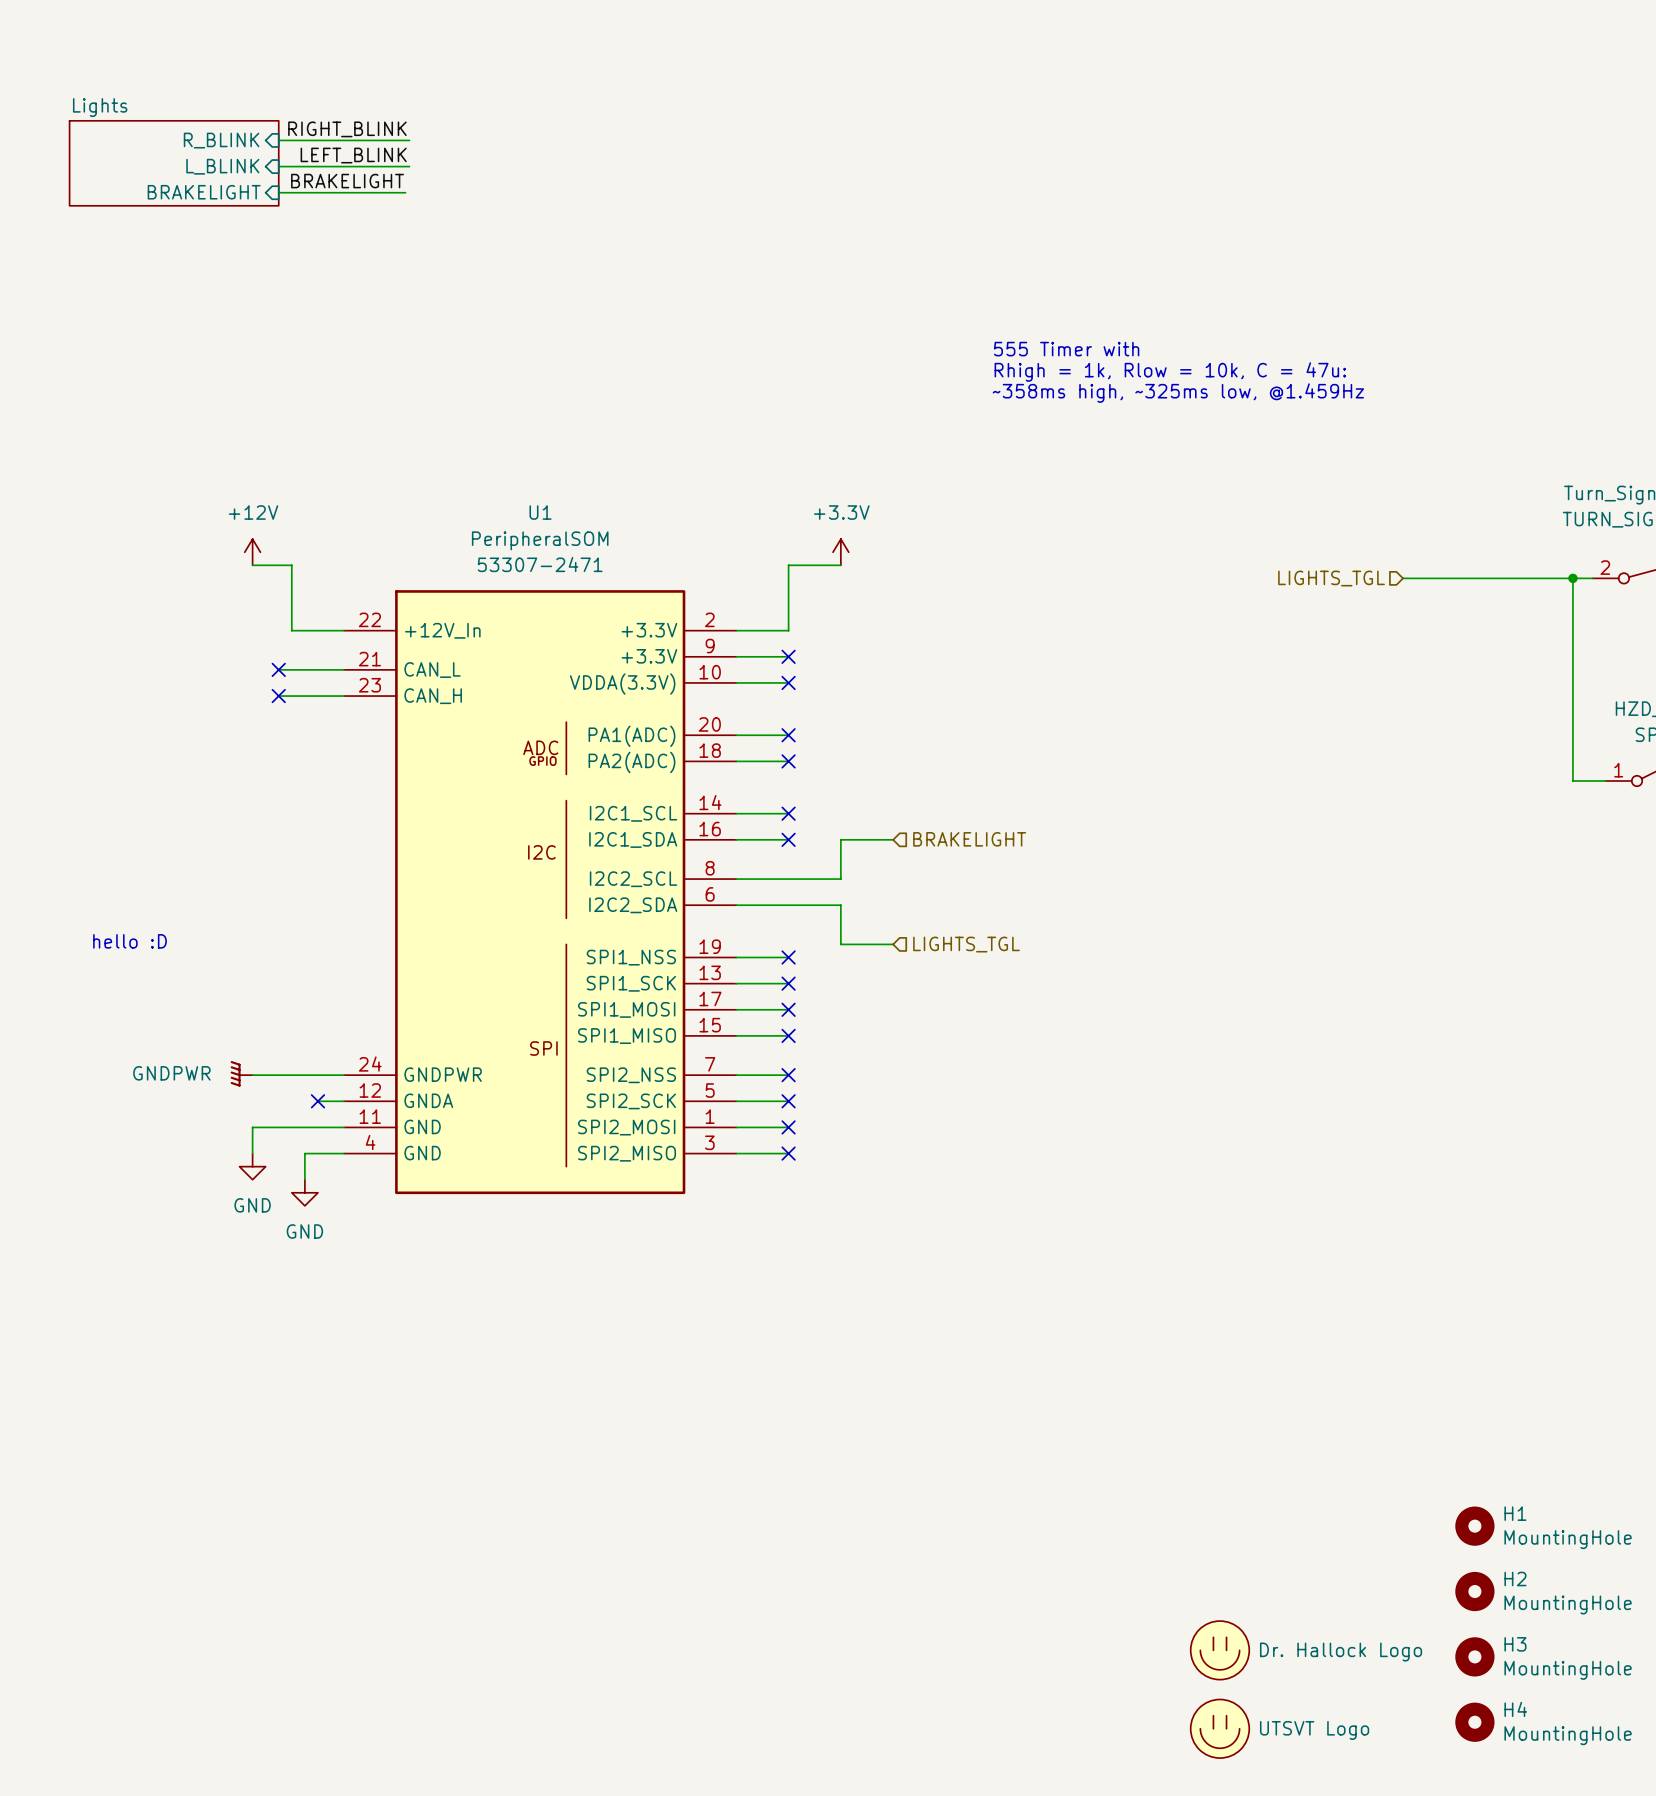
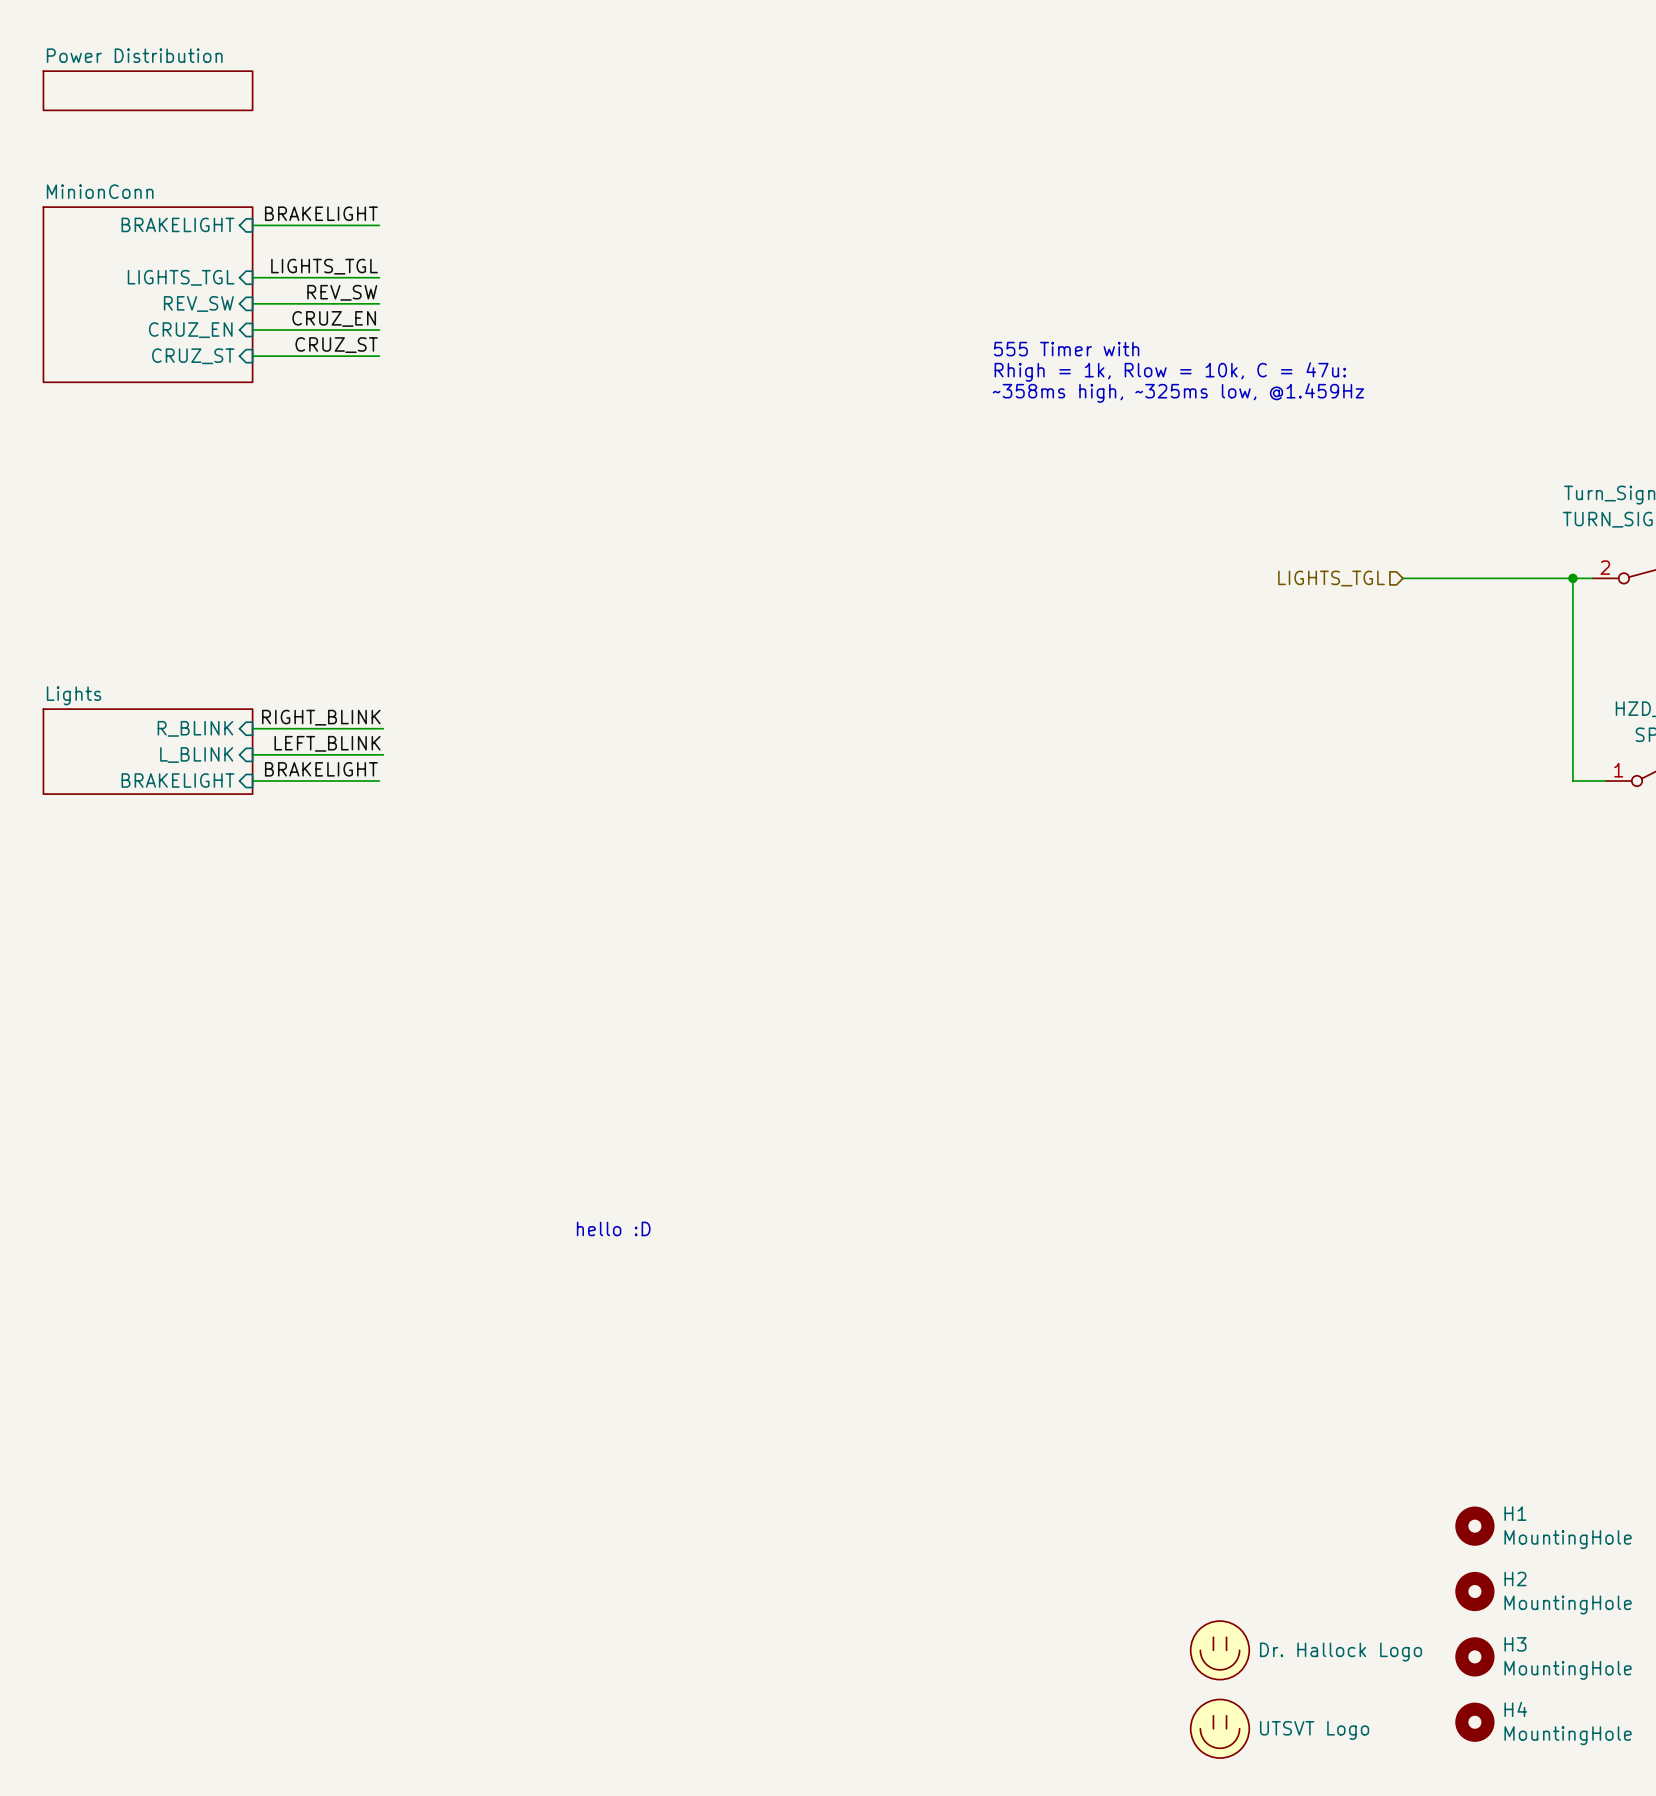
sheet Power Distribution: none -> (148, 90)
label: RIGHT_BLINK (347, 129) -> none
sheet pin: R_BLINK (221, 140) -> none
wire: (278, 140) (409, 140) -> none
label: LEFT_BLINK (353, 155) -> none
sheet Lights: (174, 163) -> none
sheet pin: L_BLINK (222, 166) -> none
wire: (278, 166) (409, 166) -> none
label position: BRAKELIGHT (347, 181) -> BRAKELIGHT (321, 213)
sheet pin position: BRAKELIGHT (204, 192) -> BRAKELIGHT (178, 224)
wire: (278, 192) (405, 192) -> (252, 225) (379, 225)
label: none -> LIGHTS_TGL (324, 266)
sheet pin: none -> LIGHTS_TGL (181, 277)
wire: none -> (252, 277) (379, 277)
label: none -> REV_SW (342, 292)
sheet MinionConn: none -> (148, 294)
sheet pin: none -> REV_SW (198, 303)
wire: none -> (252, 303) (379, 303)
label: none -> CRUZ_EN (334, 318)
wire: none -> (252, 329) (379, 329)
sheet pin: none -> CRUZ_EN (190, 330)
label: none -> CRUZ_ST (336, 345)
sheet pin: none -> CRUZ_ST (193, 356)
wire: none -> (252, 356) (379, 356)
power symbol: +12V (252, 552) -> none
power symbol: +3.3V (840, 552) -> none
wire: (252, 565) (291, 565) (291, 630) (344, 630) -> none
wire: (840, 565) (788, 565) (788, 630) (736, 630) -> none
wire: (736, 656) (788, 656) -> none
no-connect mark: (788, 656) -> none
wire: (278, 669) (344, 669) -> none
no-connect mark: (278, 669) -> none
wire: (736, 682) (788, 682) -> none
no-connect mark: (788, 682) -> none
wire: (278, 696) (344, 696) -> none
no-connect mark: (278, 696) -> none
label: none -> RIGHT_BLINK (321, 717)
sheet pin: none -> R_BLINK (195, 728)
wire: none -> (252, 728) (383, 728)
wire: (736, 735) (788, 735) -> none
no-connect mark: (788, 735) -> none
label: none -> LEFT_BLINK (327, 743)
sheet Lights: none -> (148, 751)
sheet pin: none -> L_BLINK (196, 754)
wire: none -> (252, 754) (383, 754)
wire: (736, 761) (788, 761) -> none
no-connect mark: (788, 761) -> none
label: none -> BRAKELIGHT (321, 769)
sheet pin: none -> BRAKELIGHT (178, 780)
wire: none -> (252, 781) (379, 781)
wire: (736, 813) (788, 813) -> none
no-connect mark: (788, 813) -> none
wire: (736, 839) (788, 839) -> none
no-connect mark: (788, 839) -> none
wire: (893, 839) (840, 839) (840, 879) (736, 879) -> none
hierarchical label: BRAKELIGHT (969, 839) -> none
U1: PeripheralSOM (540, 892) -> none
wire: (736, 905) (840, 905) (840, 944) (893, 944) -> none
text: hello :D (130, 941) -> none
hierarchical label: LIGHTS_TGL (966, 944) -> none
wire: (736, 957) (788, 957) -> none
no-connect mark: (788, 957) -> none
wire: (736, 983) (788, 983) -> none
no-connect mark: (788, 983) -> none
wire: (736, 1009) (788, 1009) -> none
no-connect mark: (788, 1009) -> none
wire: (736, 1035) (788, 1035) -> none
no-connect mark: (788, 1035) -> none
power symbol: GNDPWR (241, 1073) -> none
wire: (252, 1075) (344, 1075) -> none
wire: (736, 1075) (788, 1075) -> none
no-connect mark: (788, 1075) -> none
wire: (317, 1101) (344, 1101) -> none
no-connect mark: (317, 1101) -> none
wire: (736, 1101) (788, 1101) -> none
no-connect mark: (788, 1101) -> none
wire: (344, 1127) (252, 1127) (252, 1153) -> none
wire: (736, 1127) (788, 1127) -> none
no-connect mark: (788, 1127) -> none
wire: (344, 1153) (304, 1153) (304, 1179) -> none
wire: (736, 1153) (788, 1153) -> none
no-connect mark: (788, 1153) -> none
power symbol: GND (252, 1166) -> none
power symbol: GND (304, 1192) -> none
text: none -> hello :D (613, 1228)

